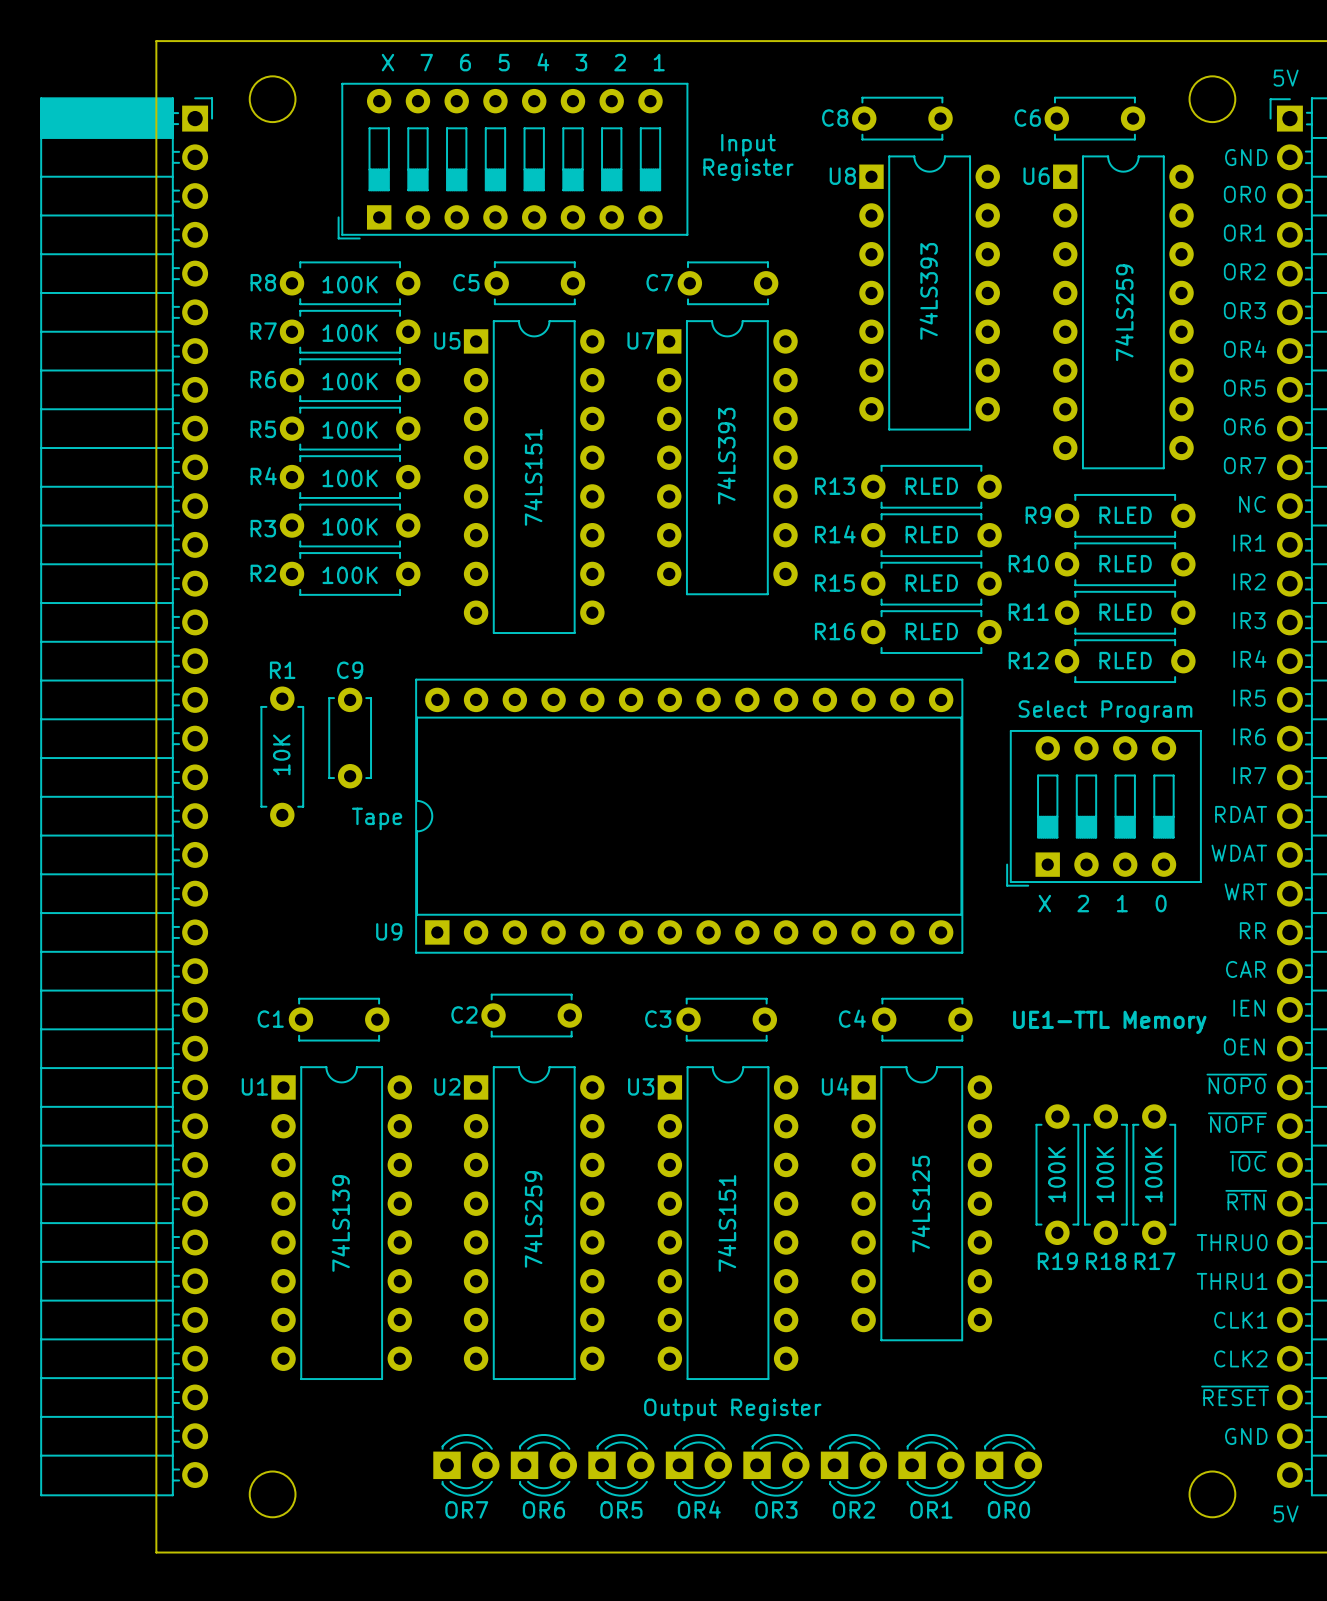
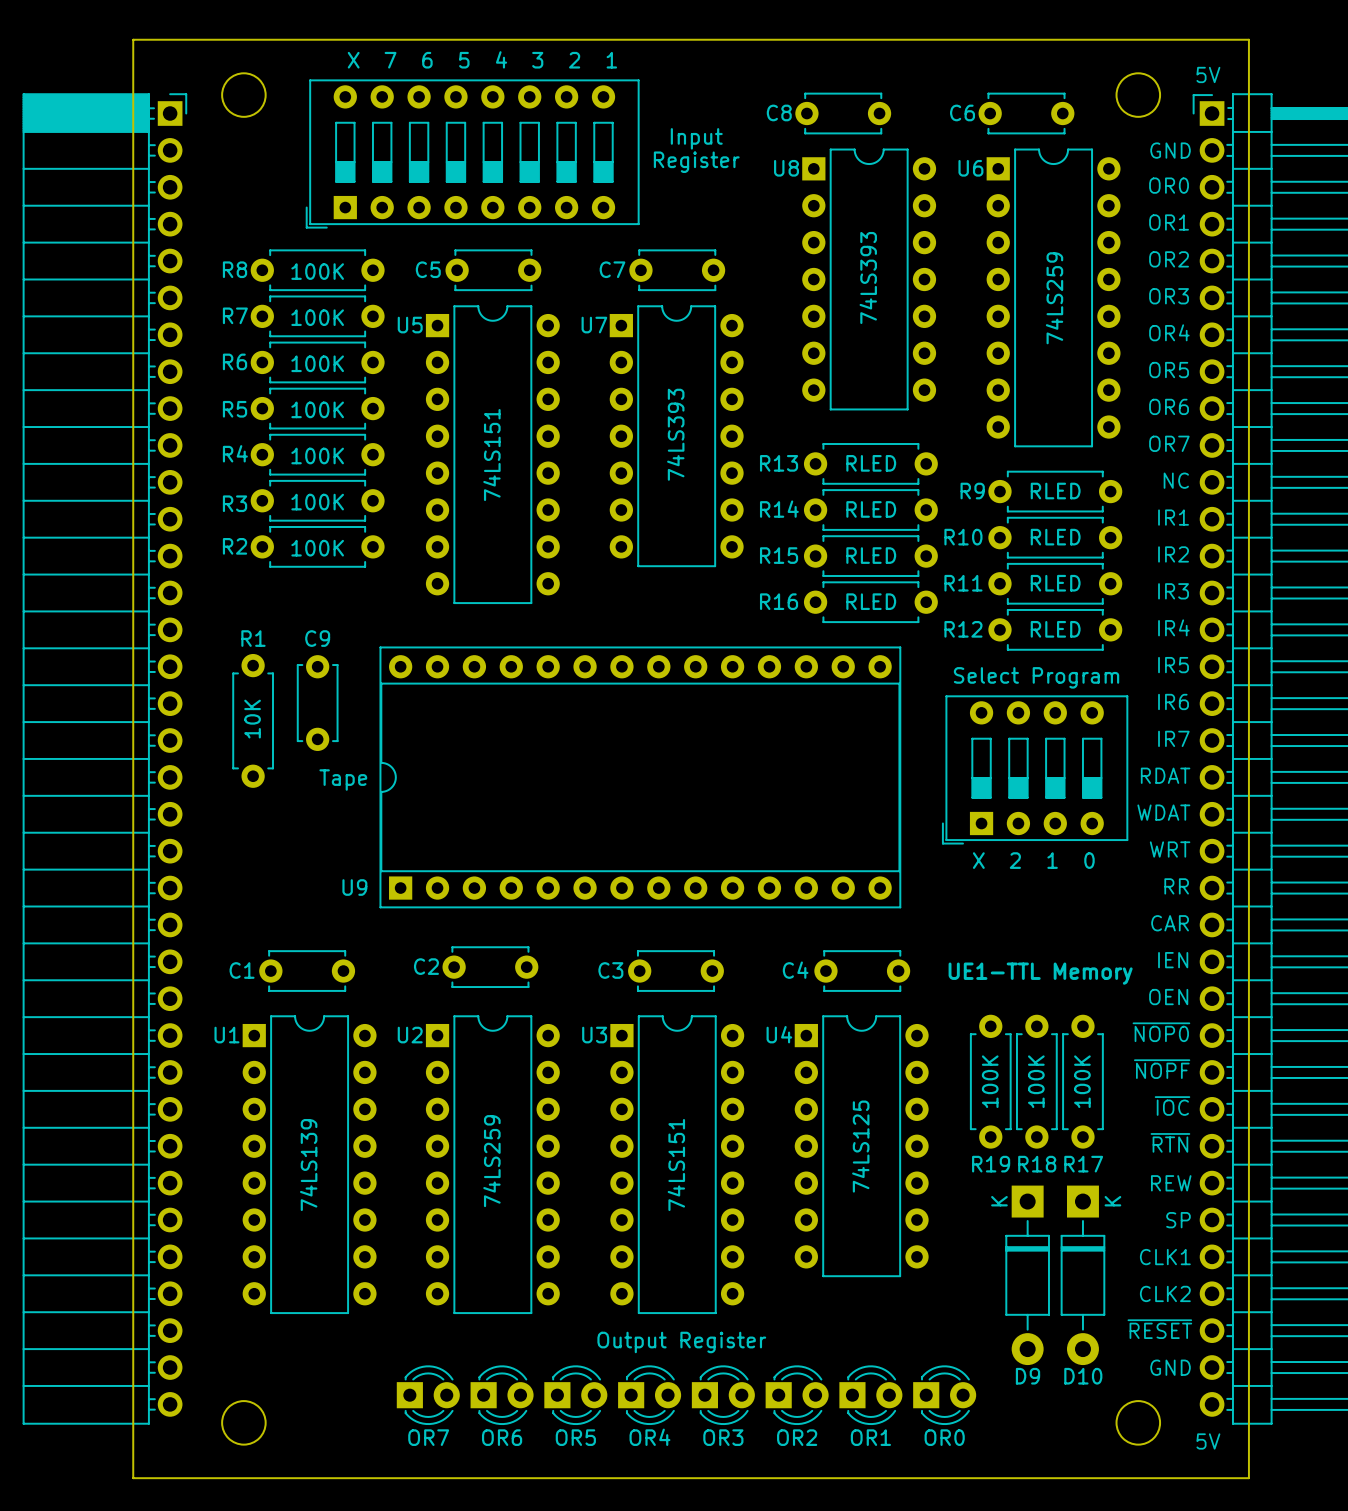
R19 position: (1057, 1174) -> (990, 1081)
R18 position: (1105, 1174) -> (1036, 1081)
R17 position: (1154, 1174) -> (1082, 1081)
text: THRU0 (1232, 1242) -> REW (1171, 1183)
text: THRU1 (1232, 1281) -> SP (1178, 1220)
D9: none -> (1027, 1275)
D10: none -> (1082, 1275)

